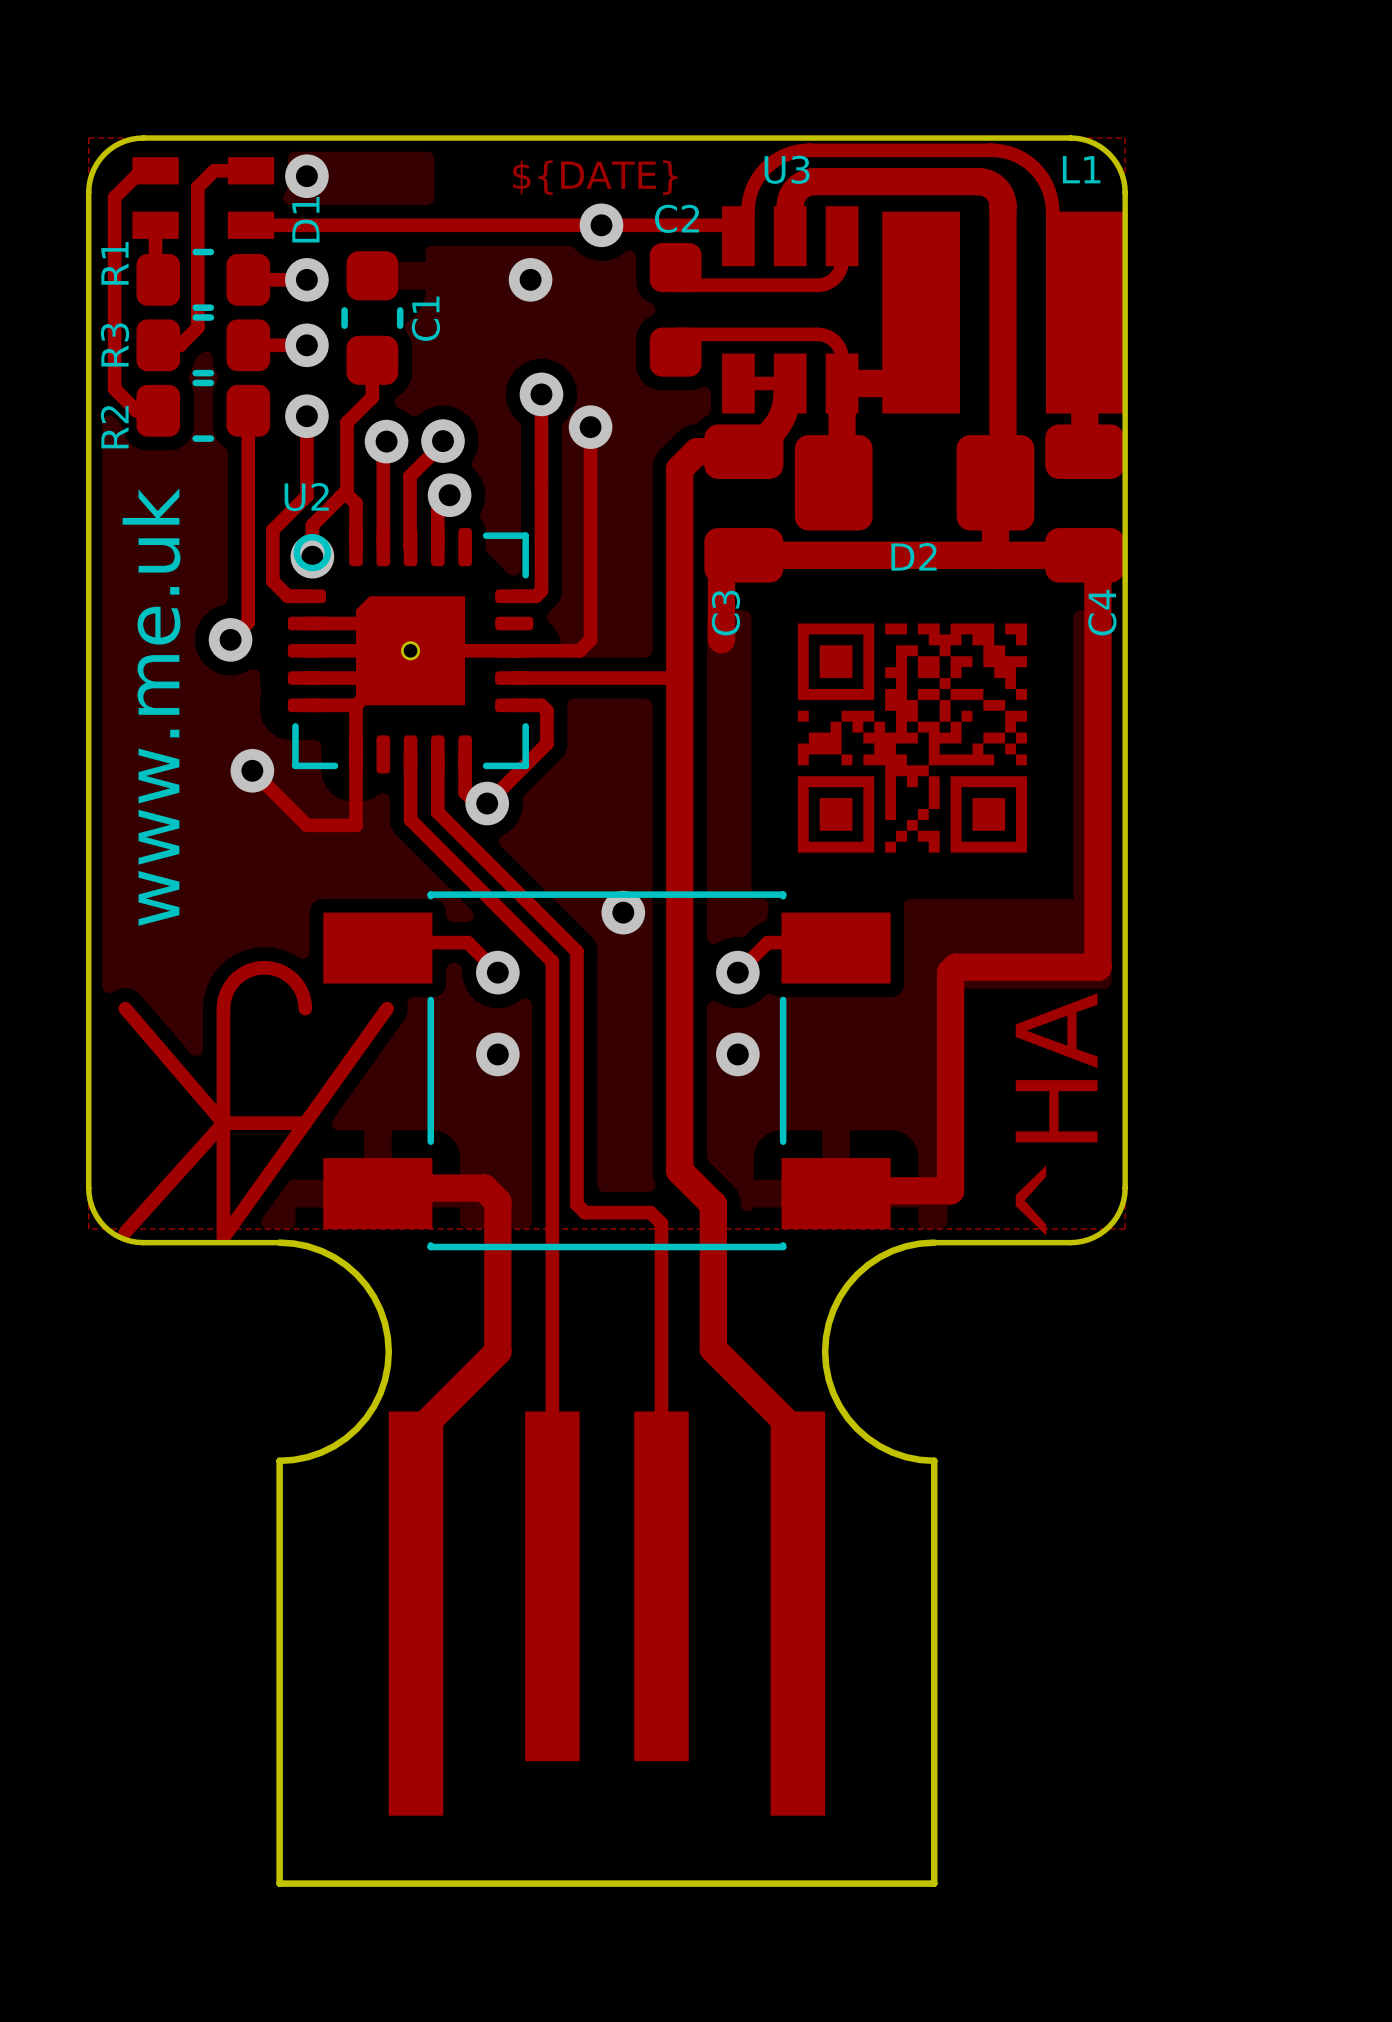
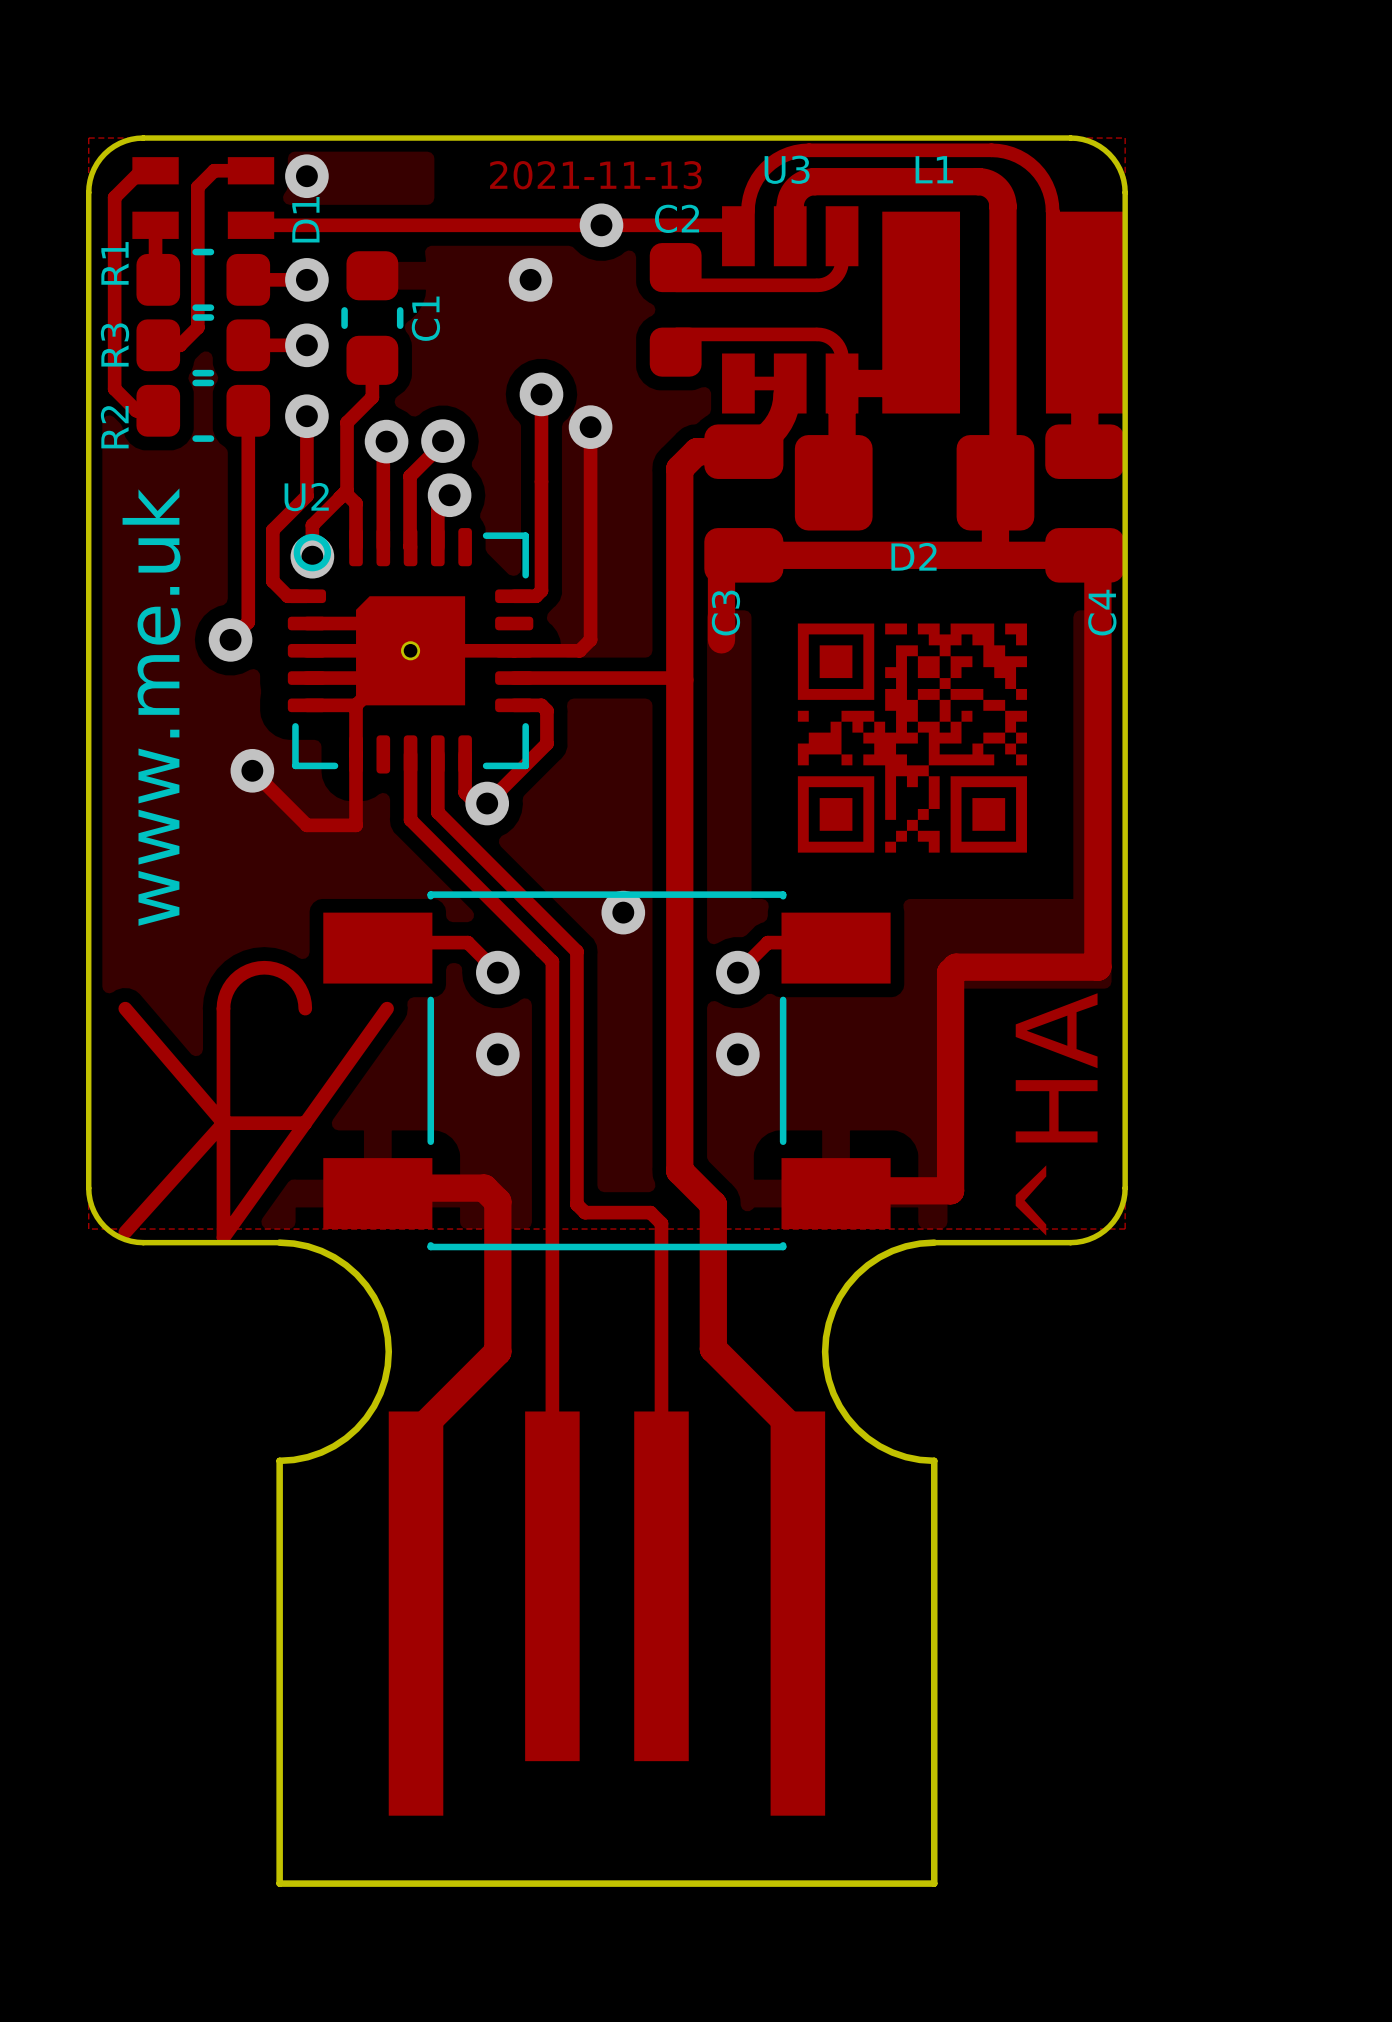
L1 position: (1081, 169) -> (934, 169)
text: ${DATE} (595, 177) -> 2021-11-13 (595, 175)

